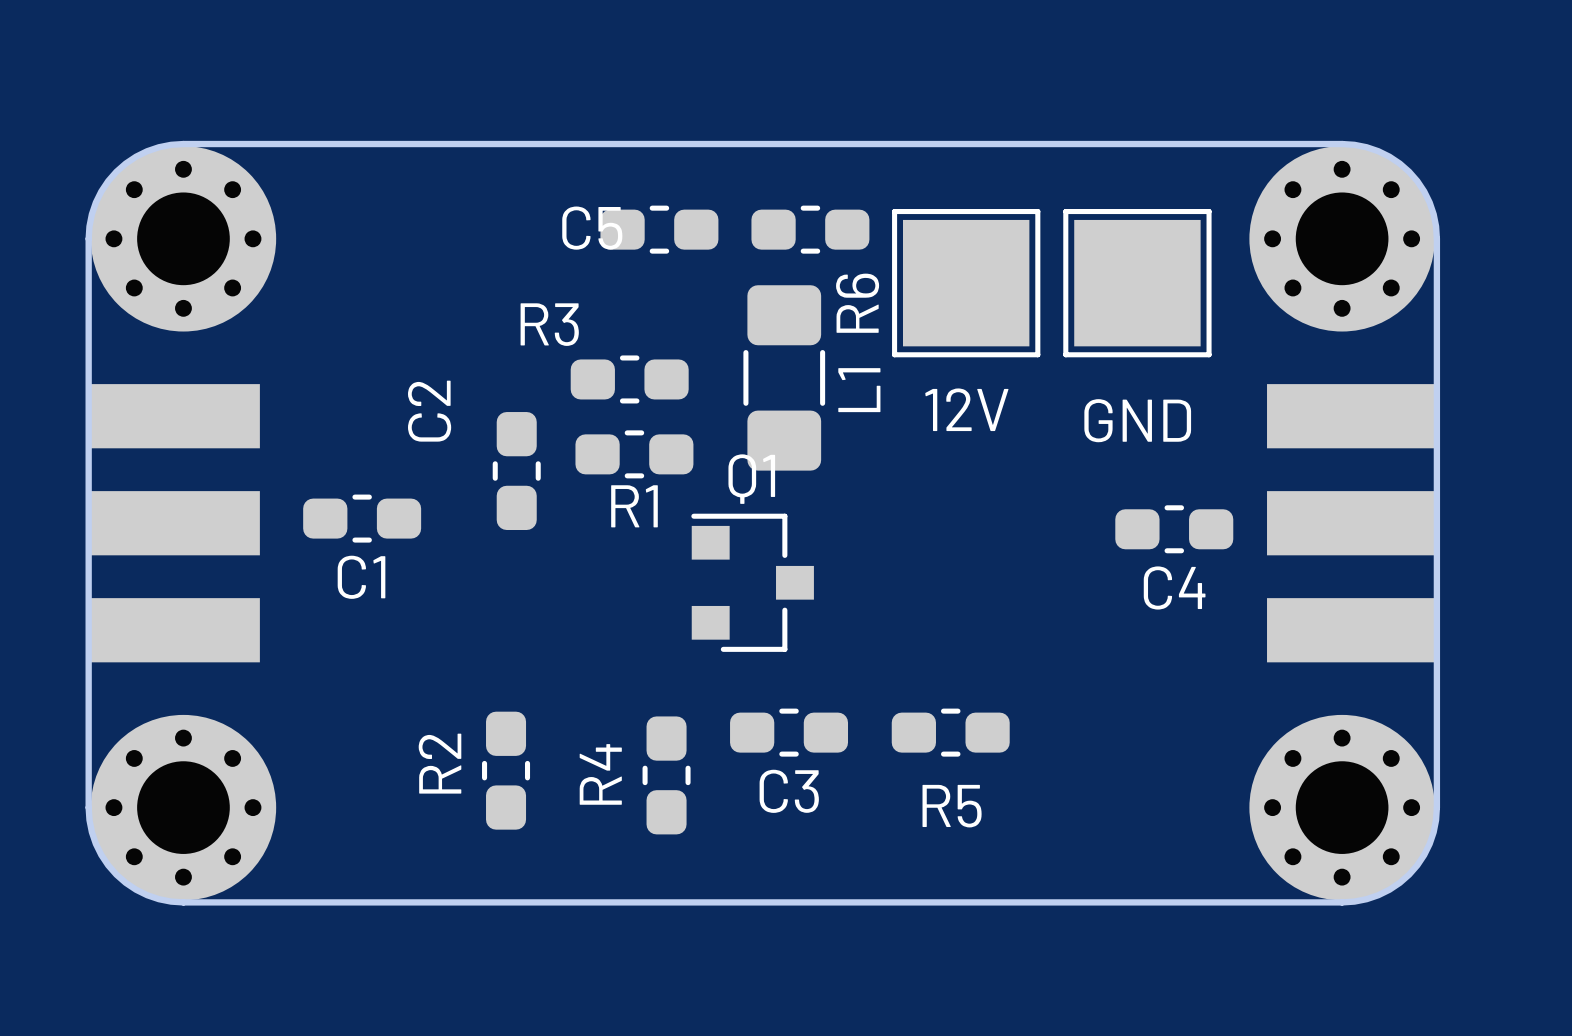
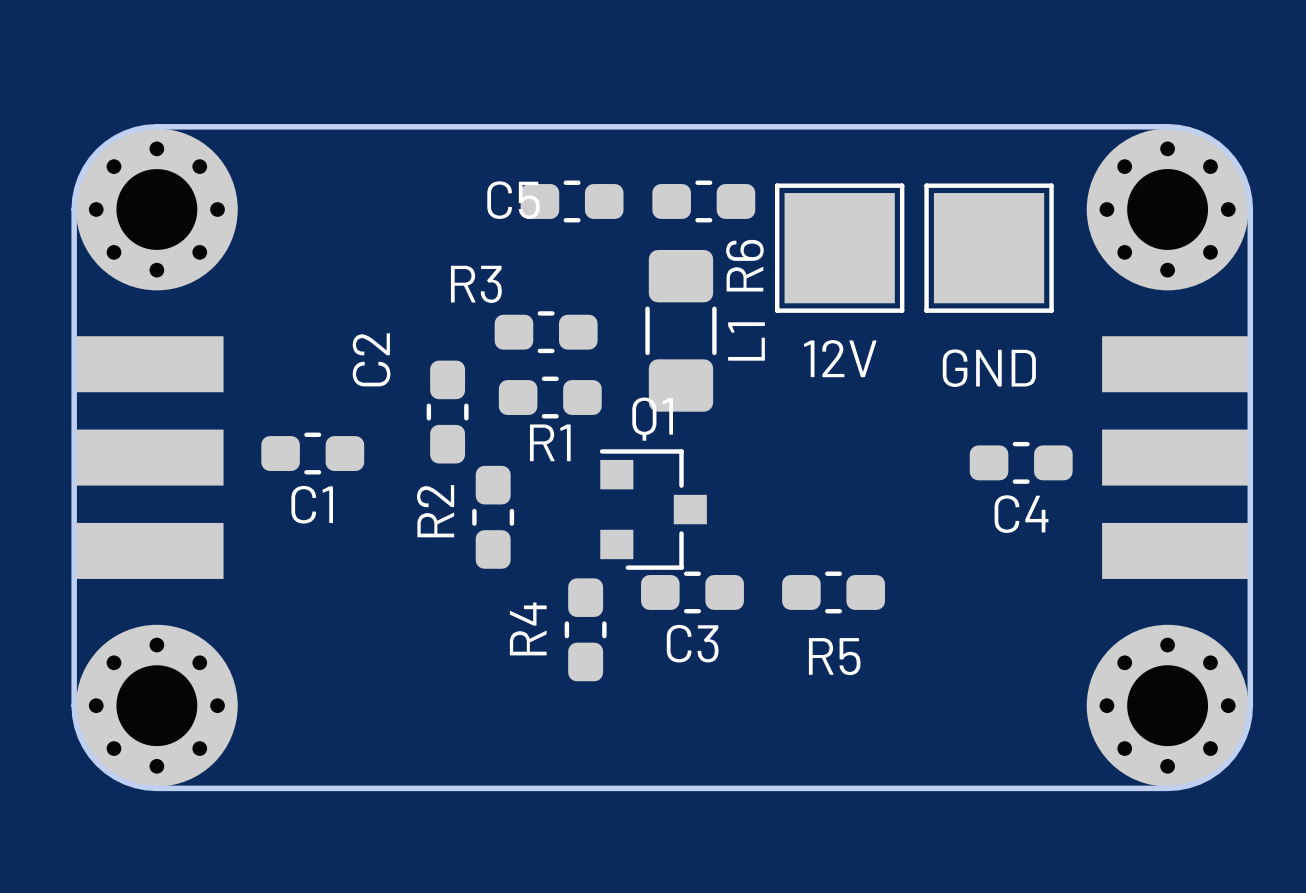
C3 position: (789, 732) -> (692, 592)
R5 position: (950, 732) -> (833, 592)
R2 position: (506, 770) -> (493, 517)
R4 position: (666, 775) -> (585, 629)

